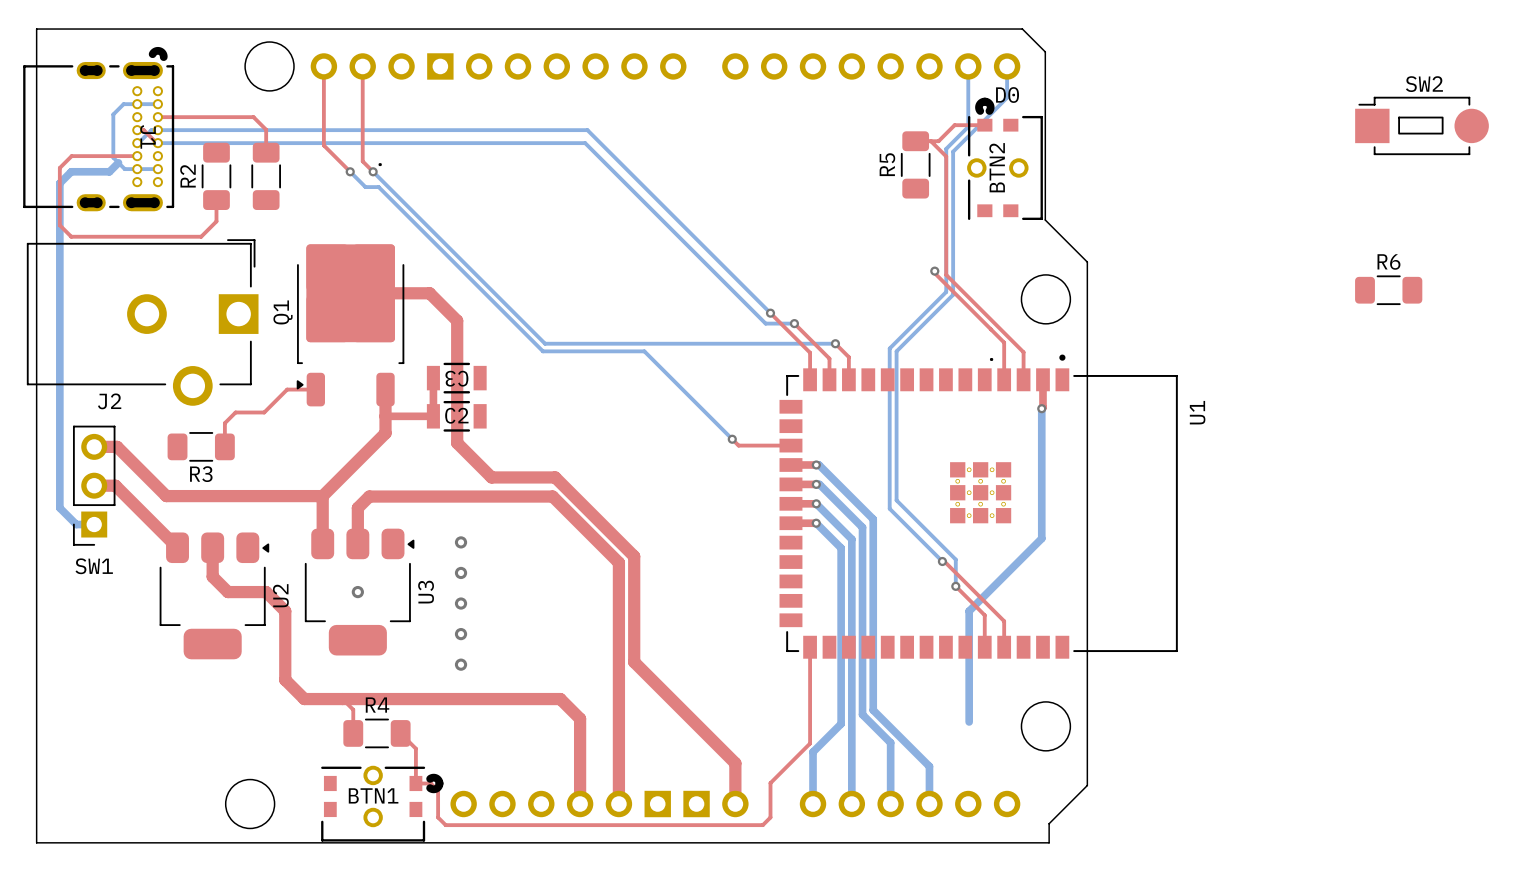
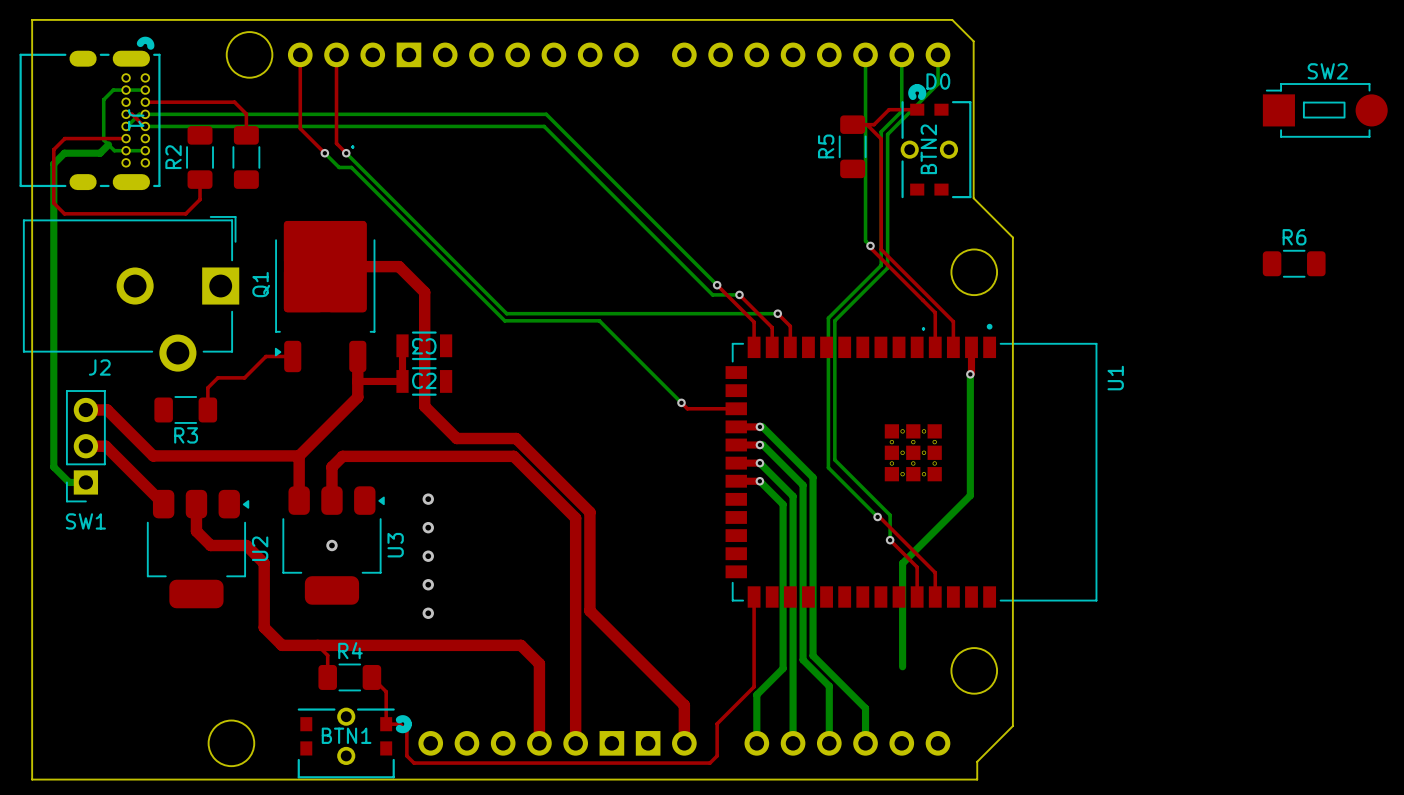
bottom track: none -> (865, 54) (865, 240) (870, 245)

